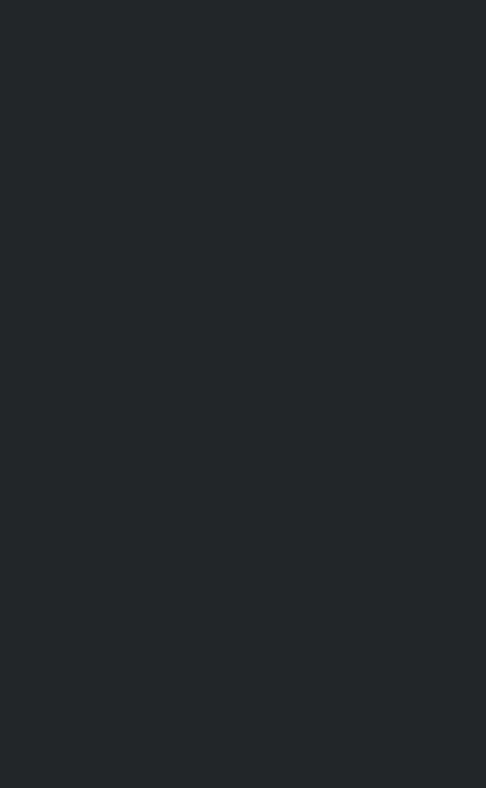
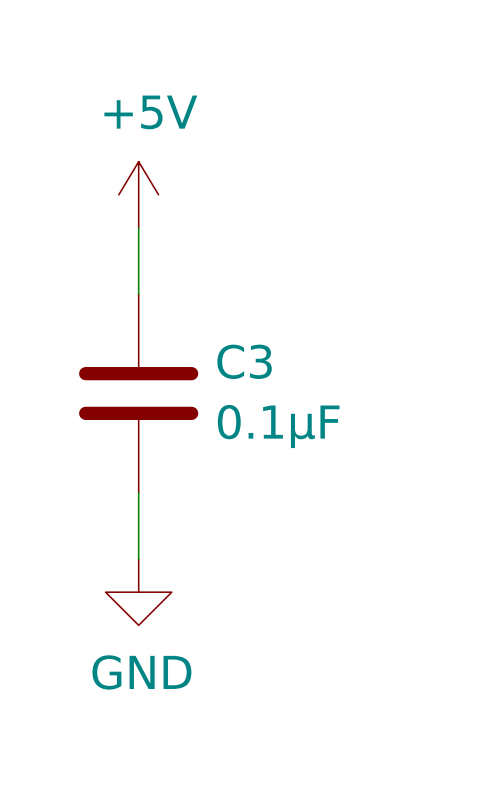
power symbol: none -> +5V (138, 194)
wire: none -> (138, 227) (138, 294)
C3: none -> 0.1µF (138, 393)
wire: none -> (138, 492) (138, 559)
power symbol: none -> GND (138, 592)

